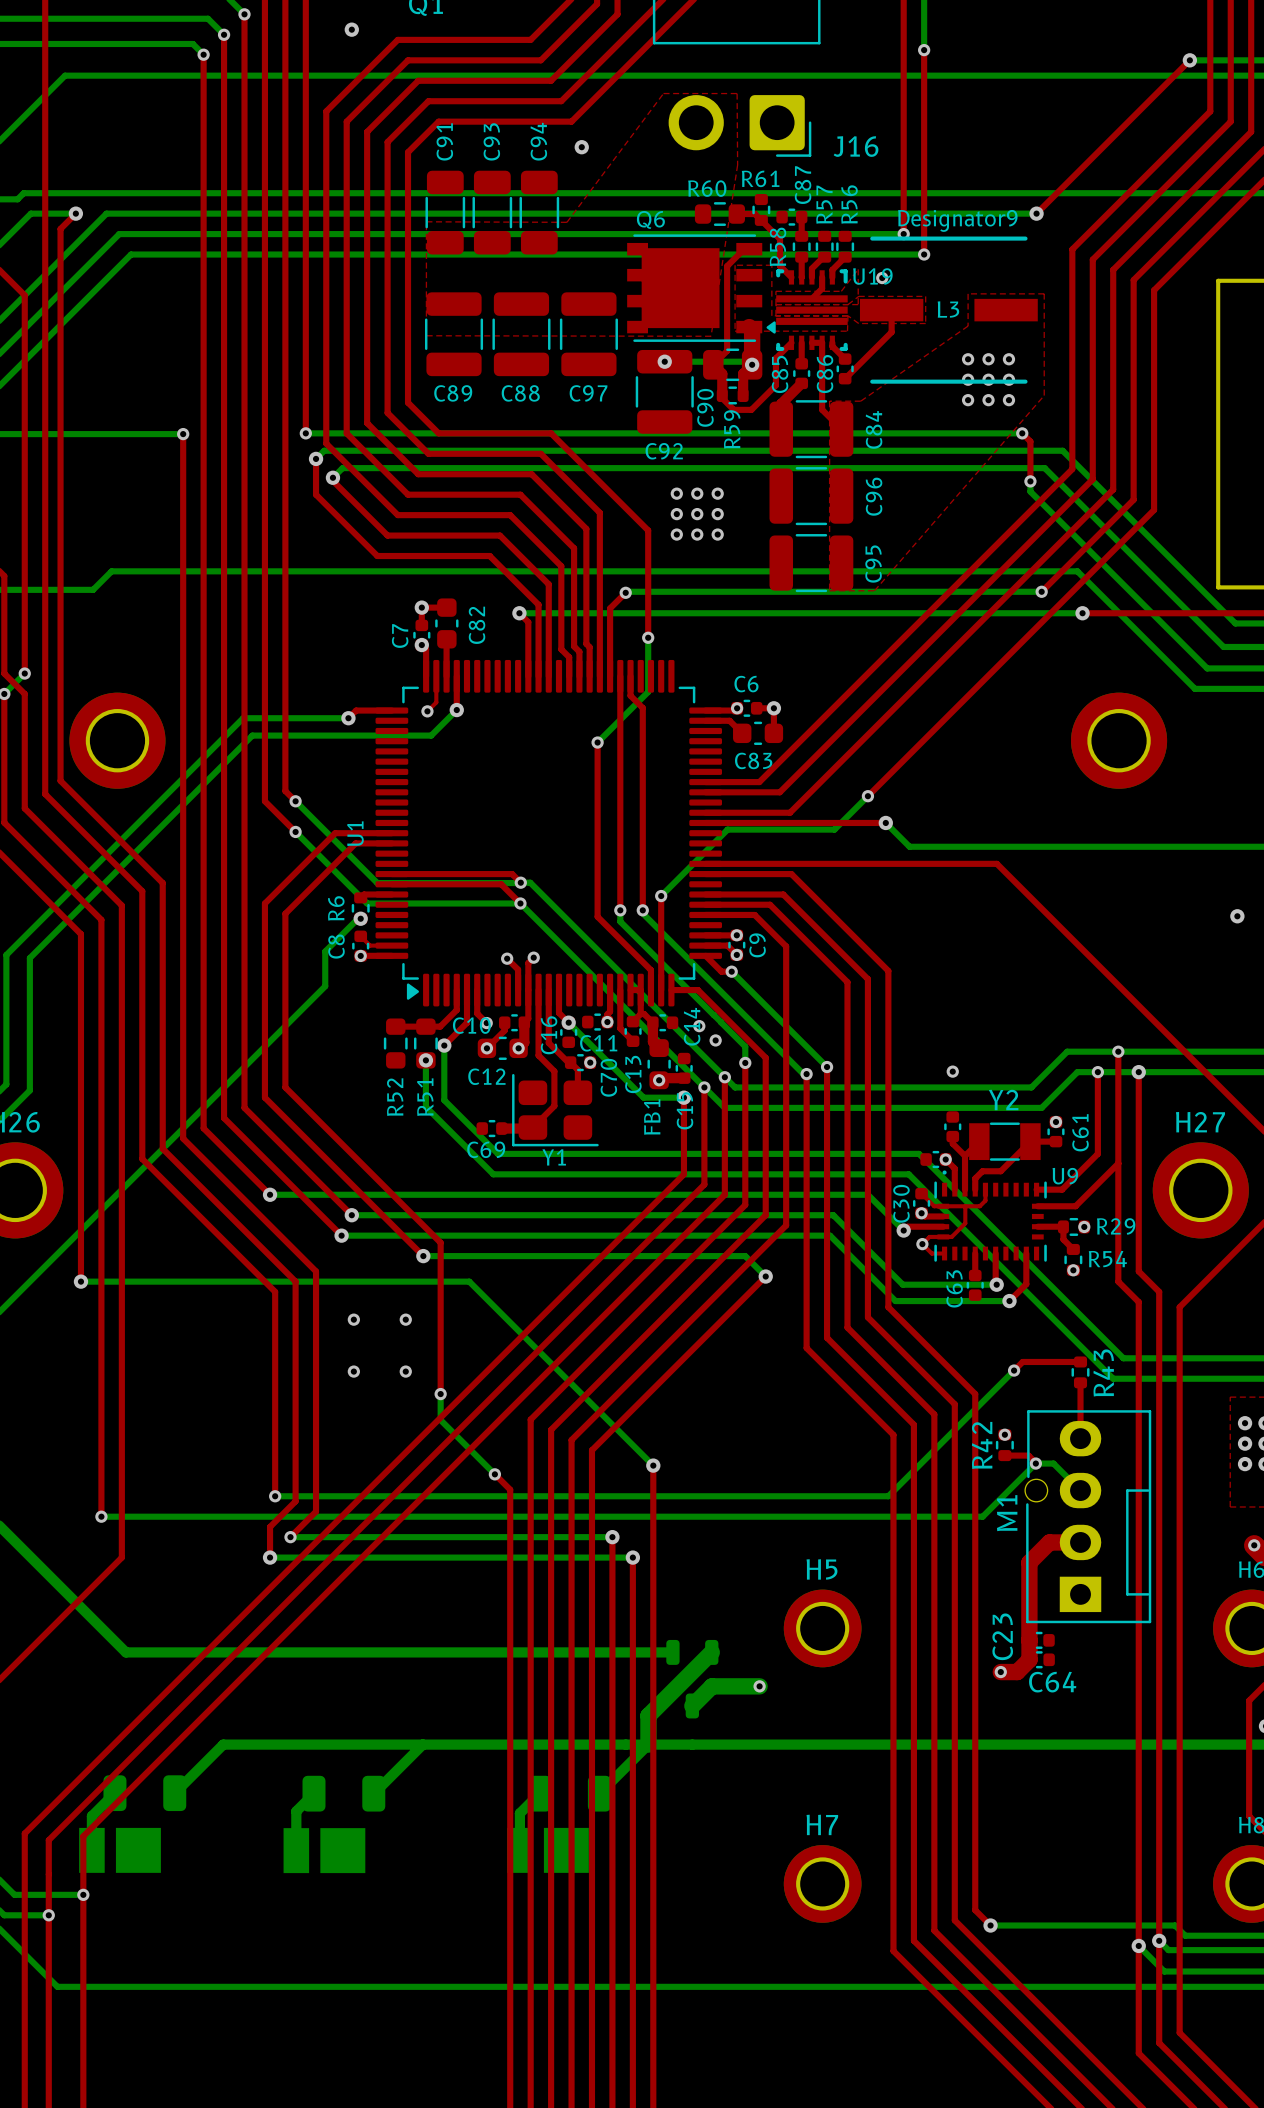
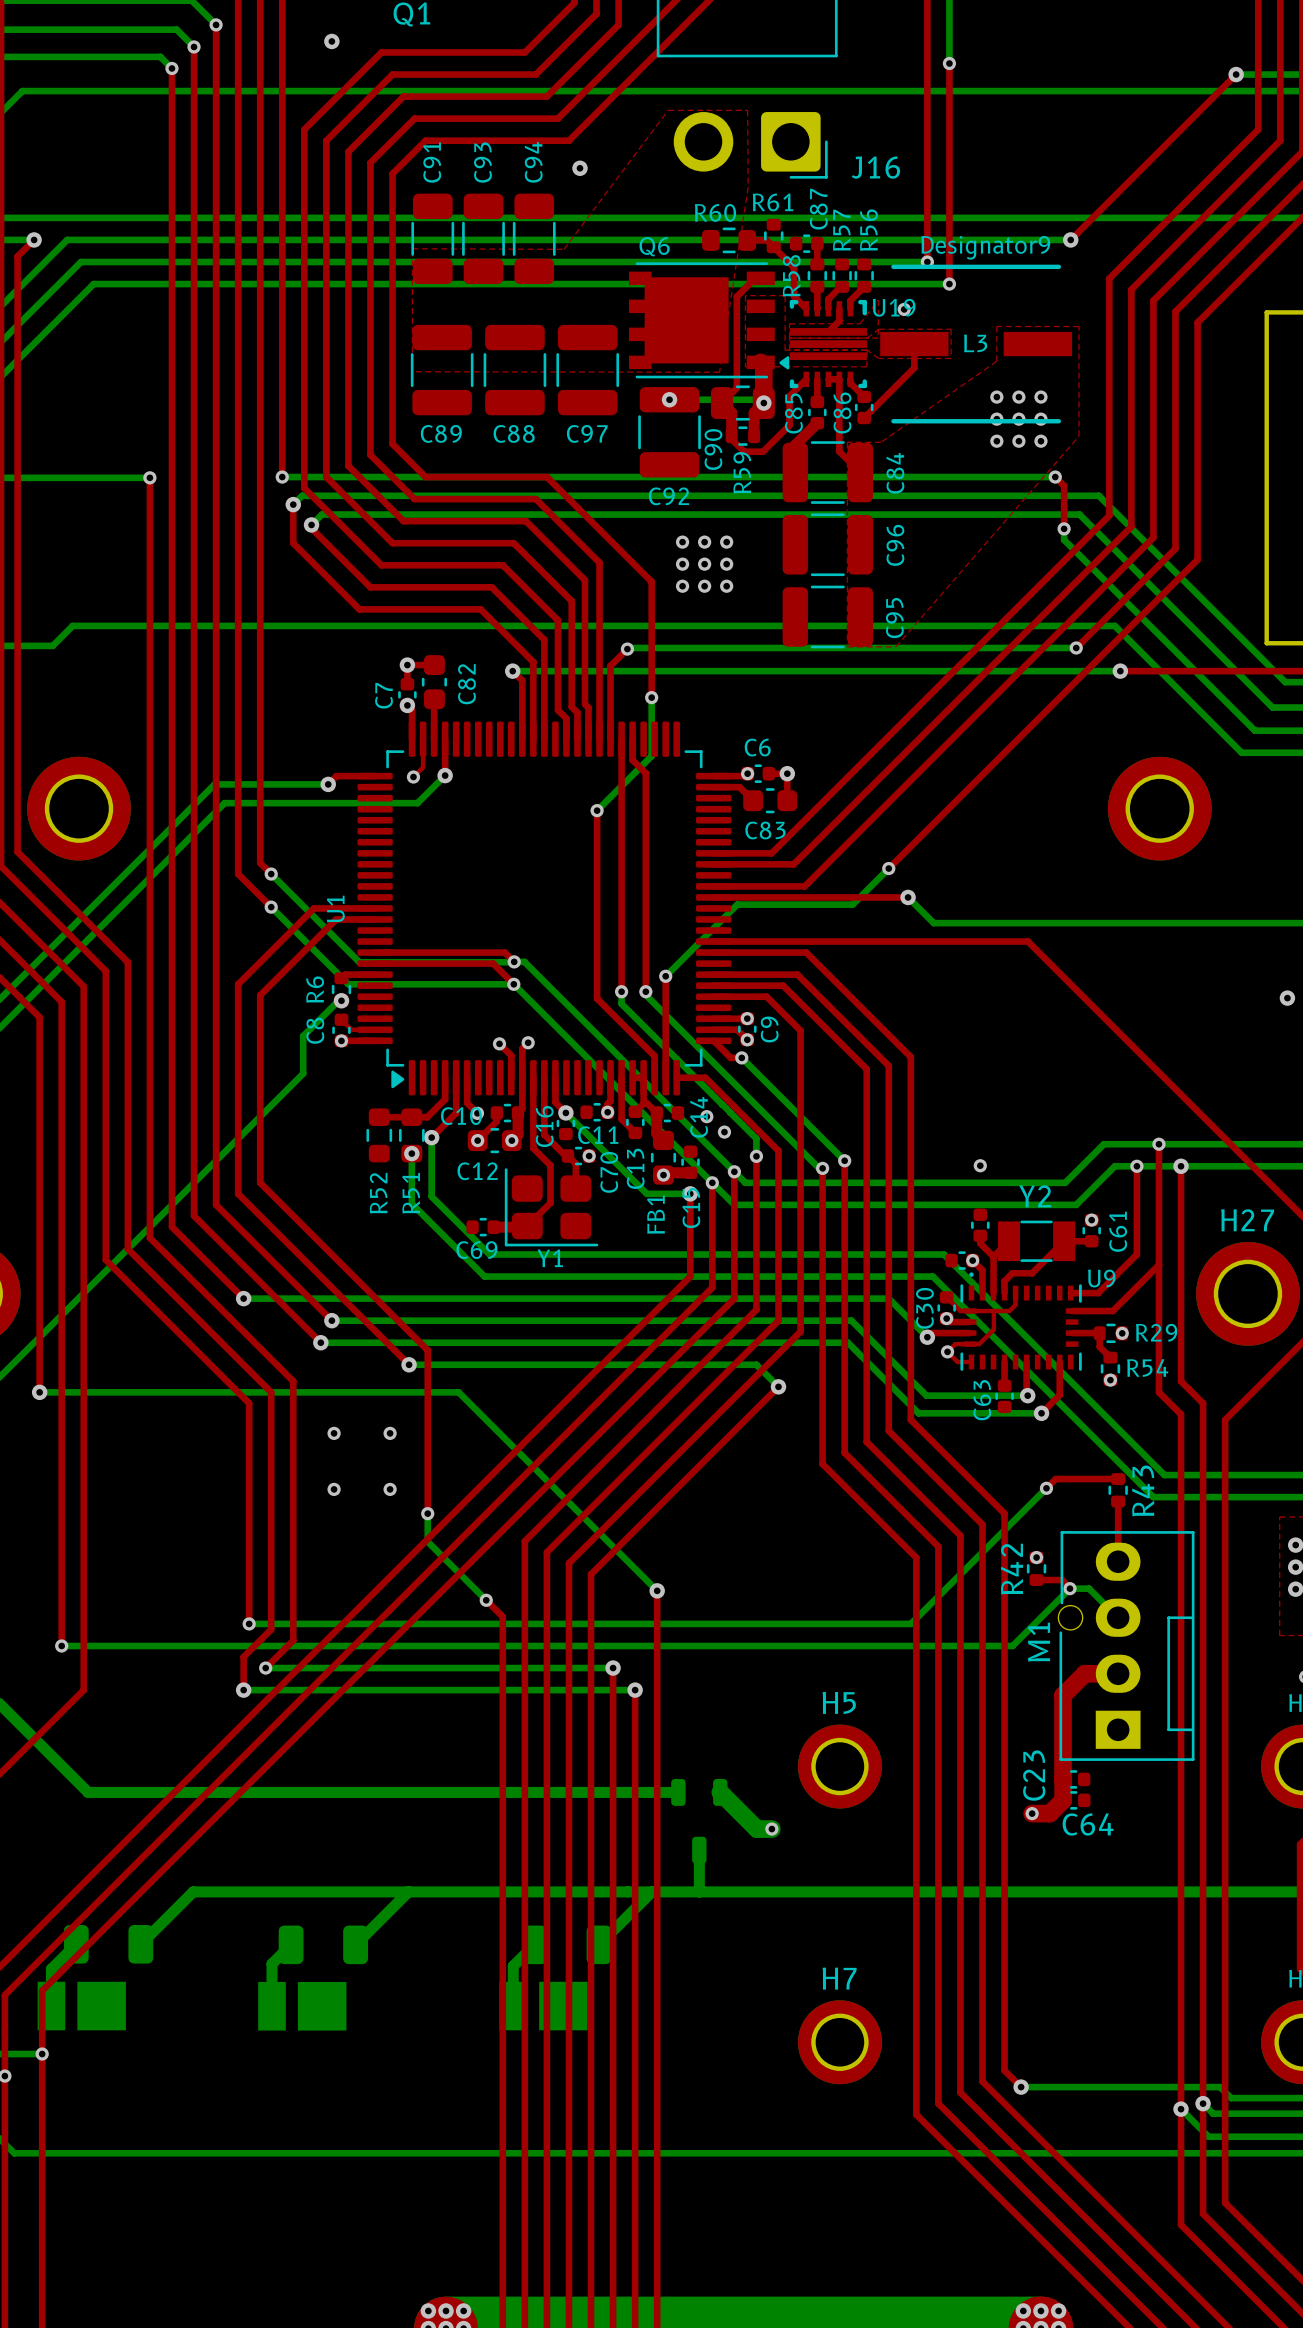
bottom track: (711, 1652) (648, 1715) (648, 1744) -> none
bottom track: (745, 1686) (711, 1686) (692, 1705) -> (756, 1829) (720, 1792)
bottom track: none -> (699, 1850) (699, 1891)

